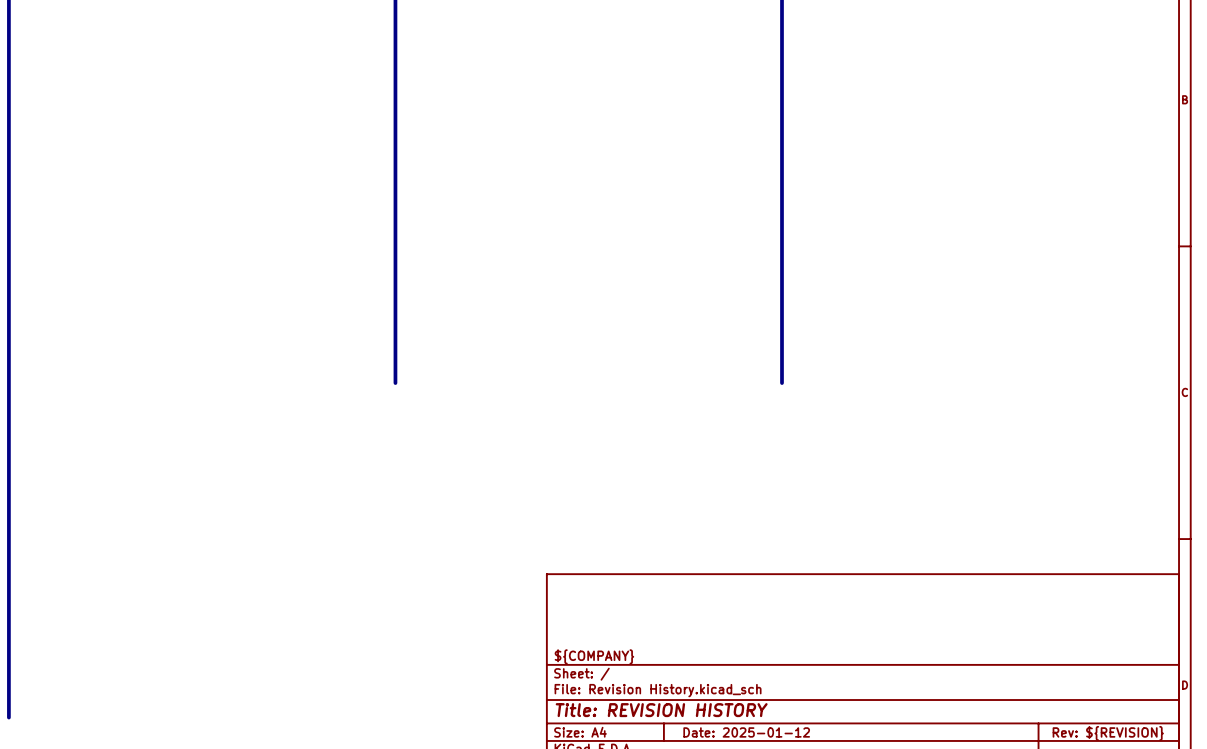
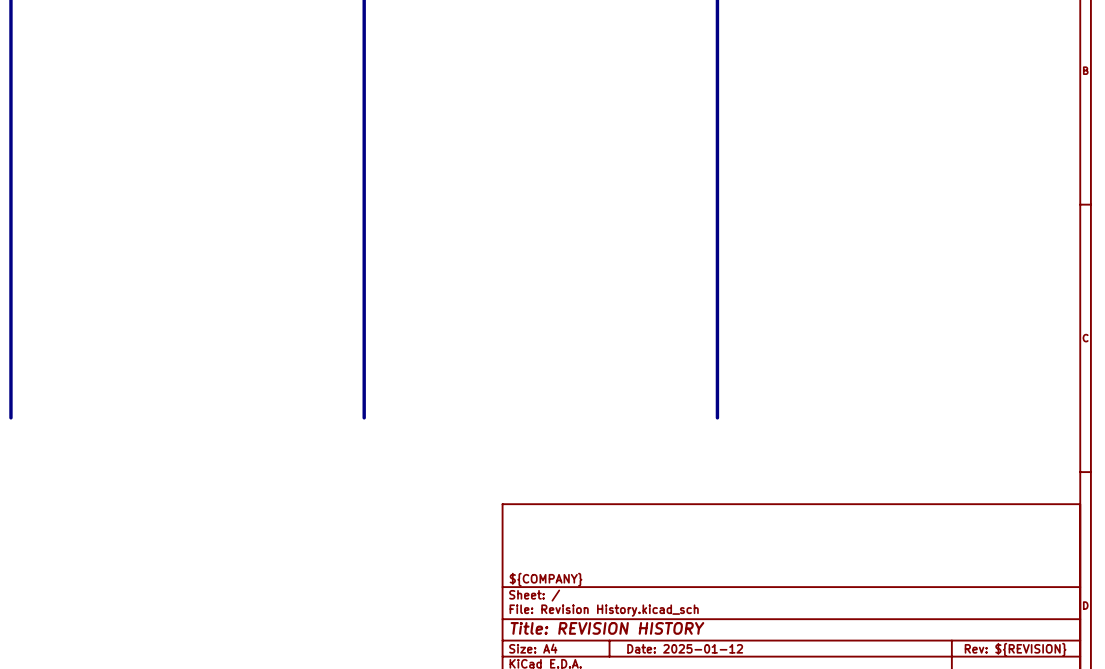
line: none -> (364, 329) (364, 417)
line: none -> (717, 329) (717, 417)
line: (8, 479) (8, 717) -> none

